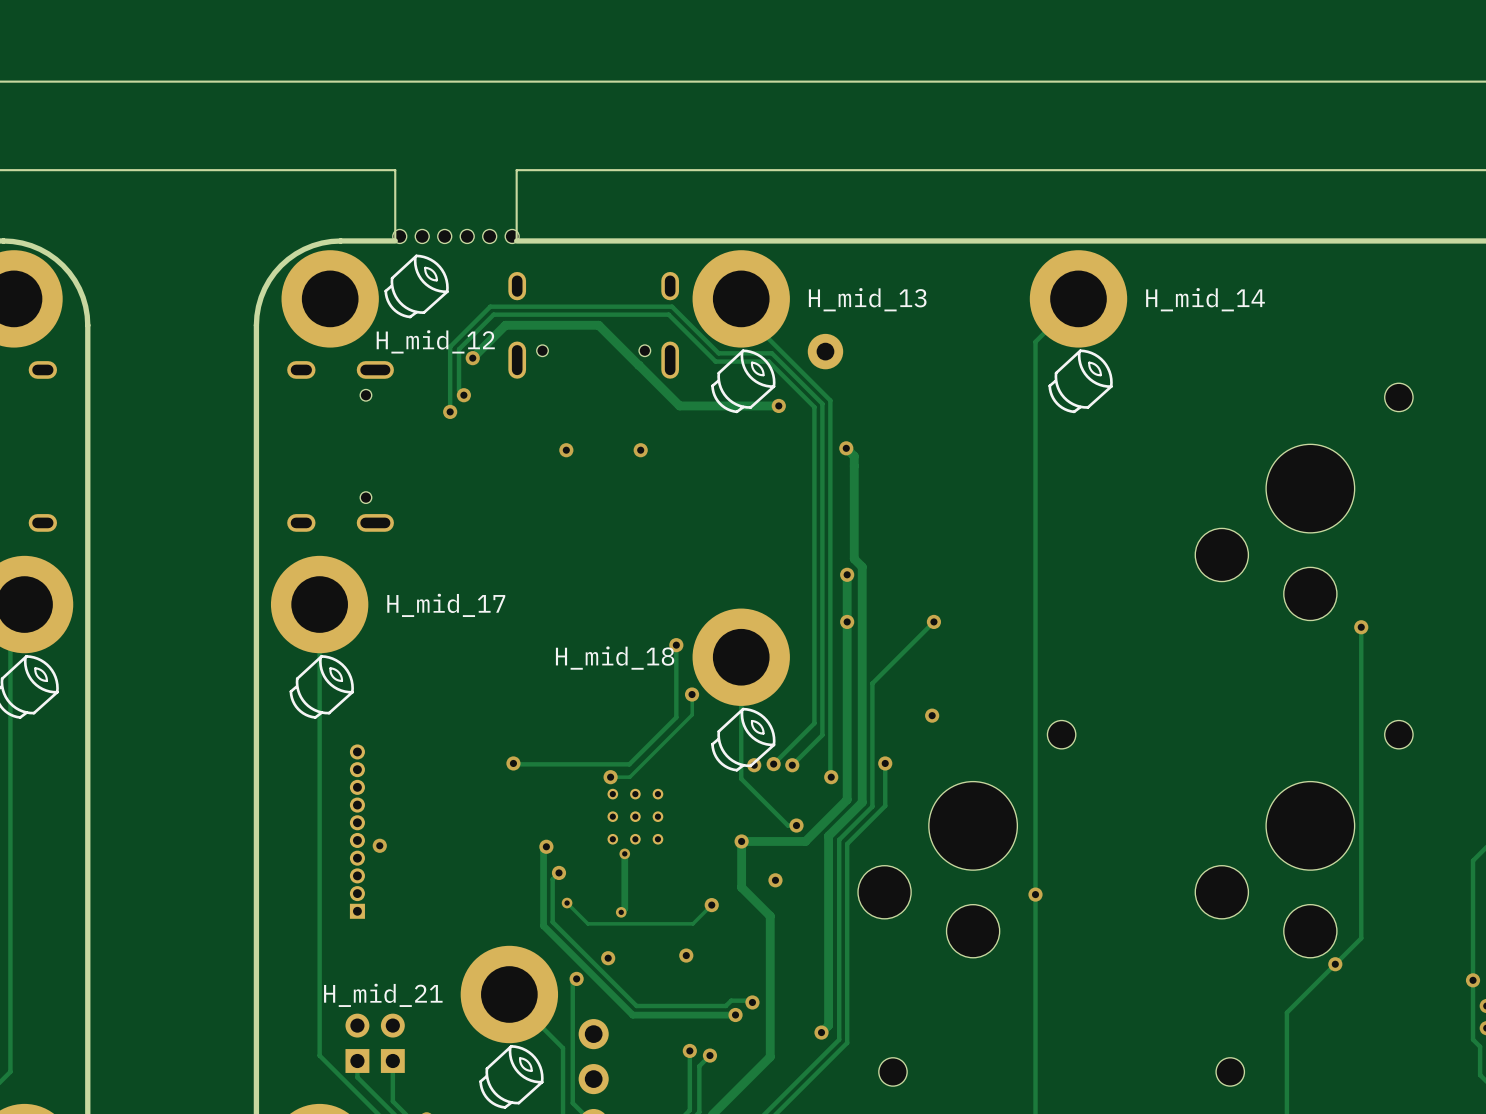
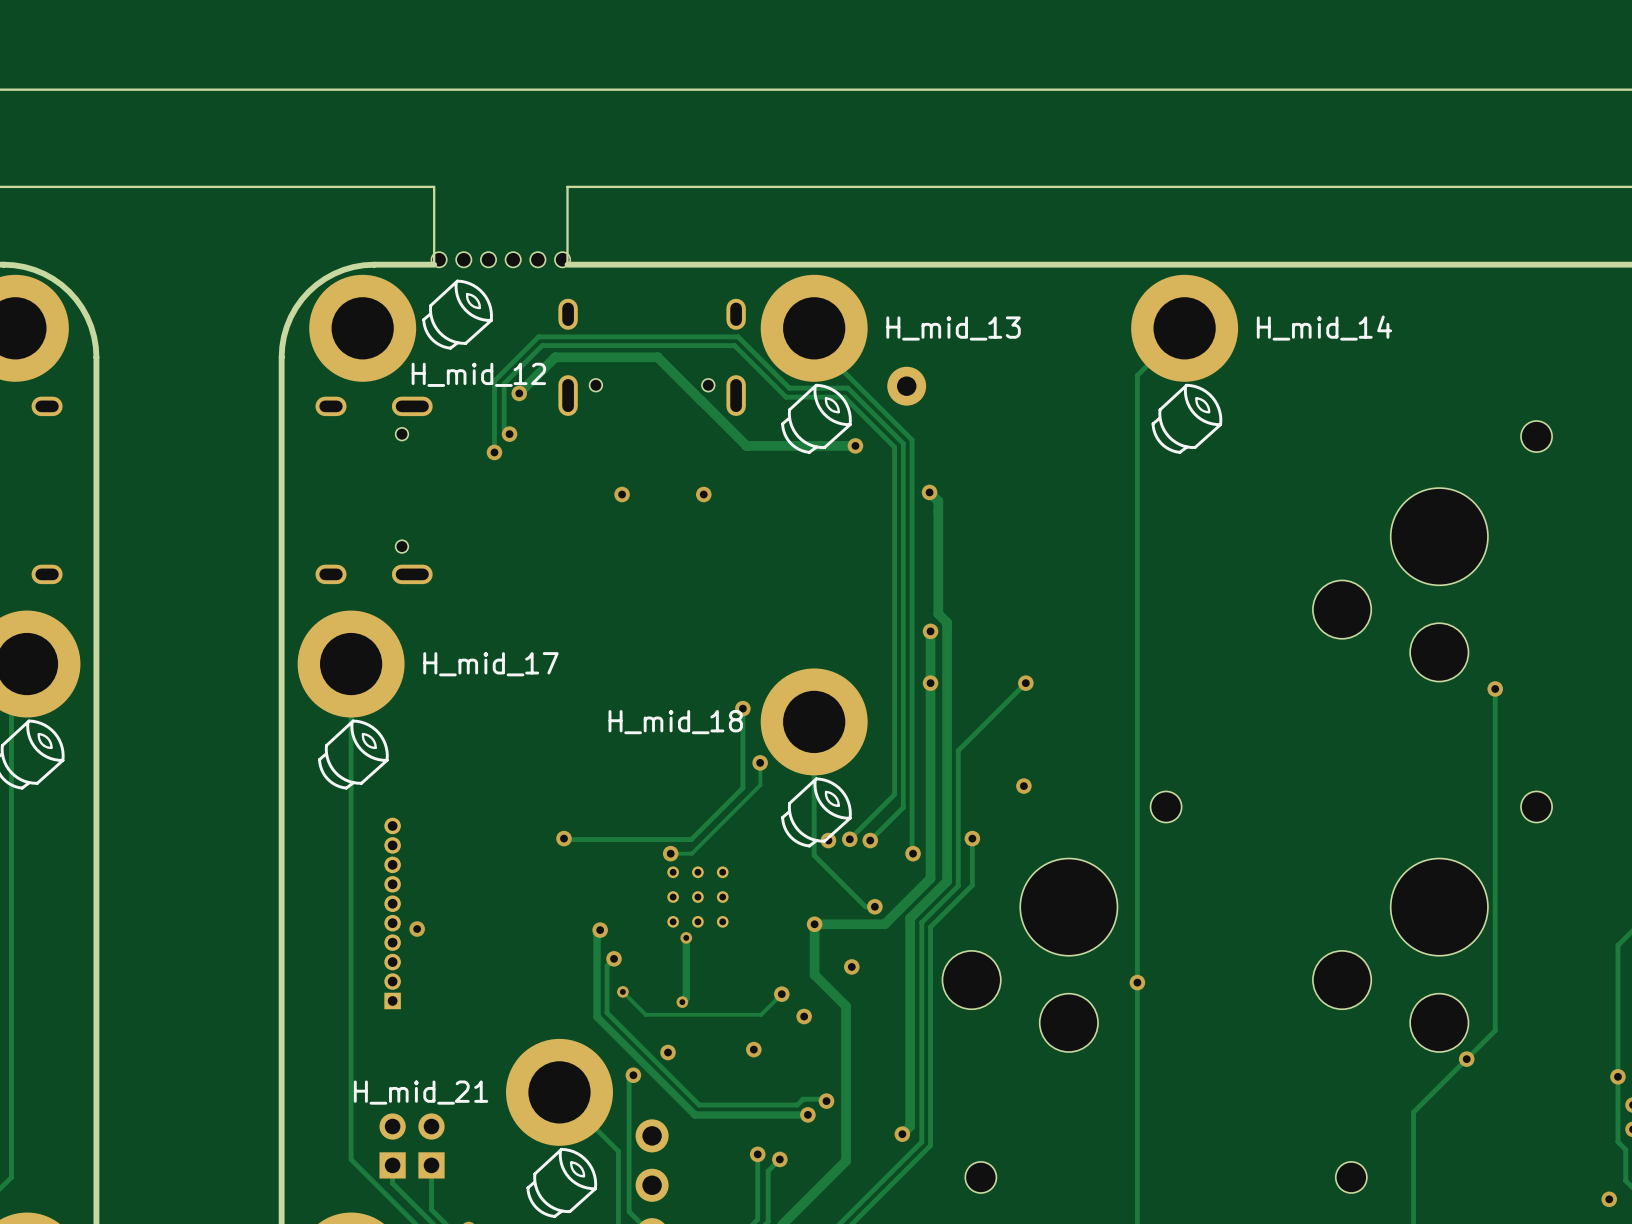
via: none -> (804, 1016)
via: none -> (1609, 1199)

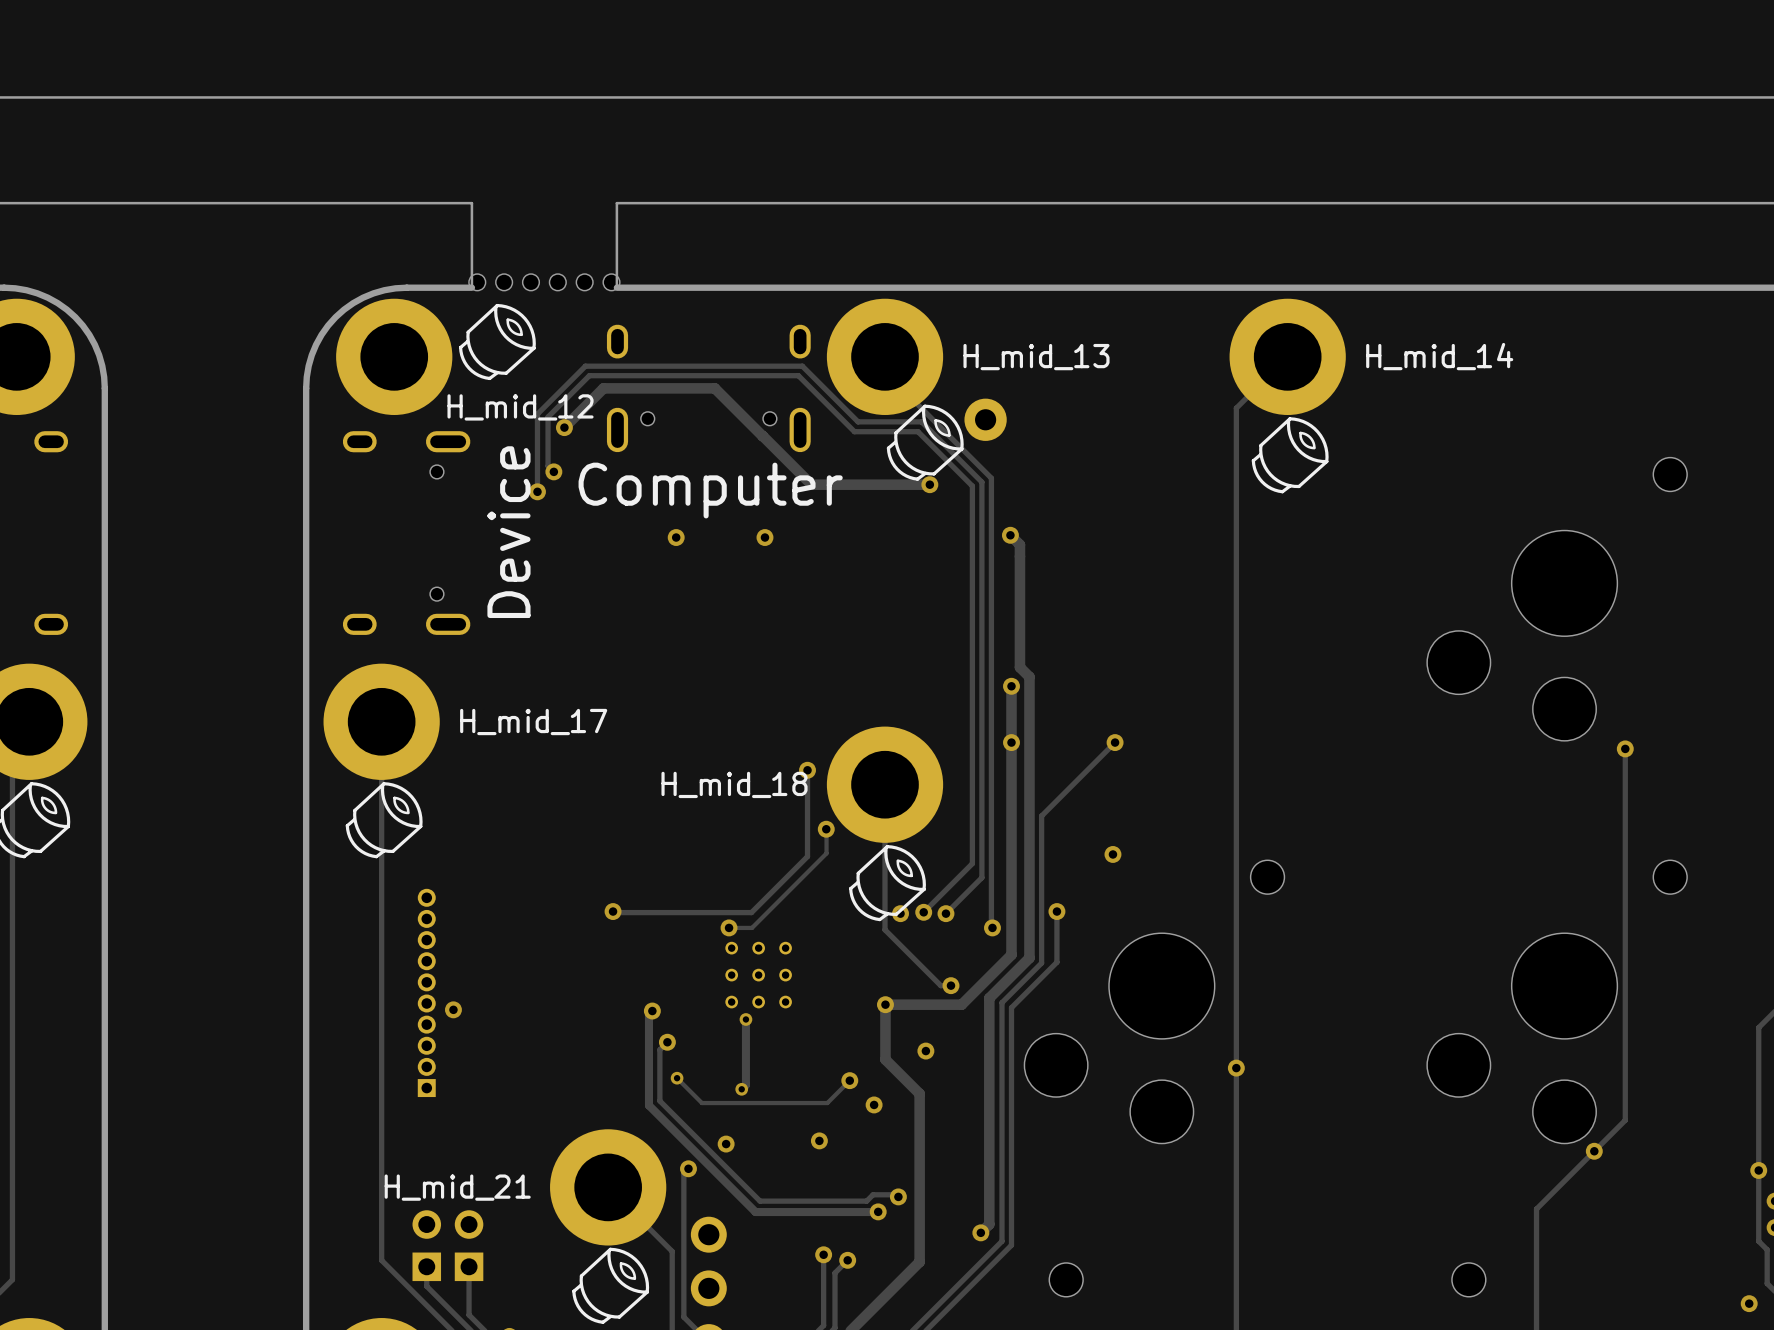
drawing position: (816, 418) -> (925, 442)
text: none -> Computer (710, 490)
text: none -> Device (508, 532)

